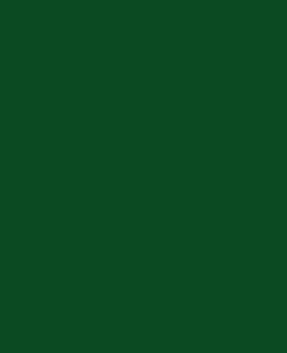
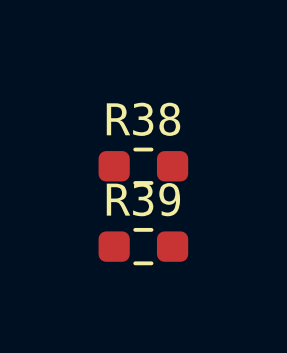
R38: none -> (143, 166)
R39: none -> (143, 246)

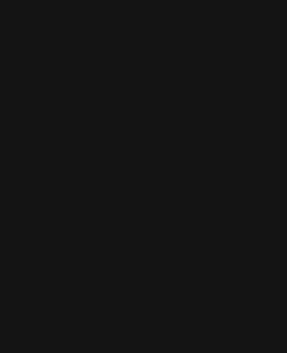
R38: (143, 166) -> none
R39: (143, 246) -> none

